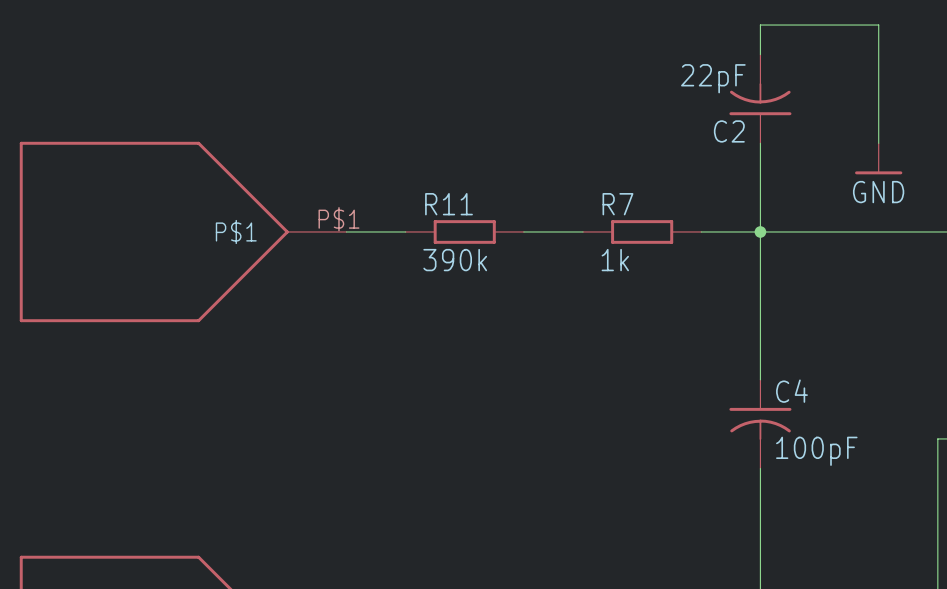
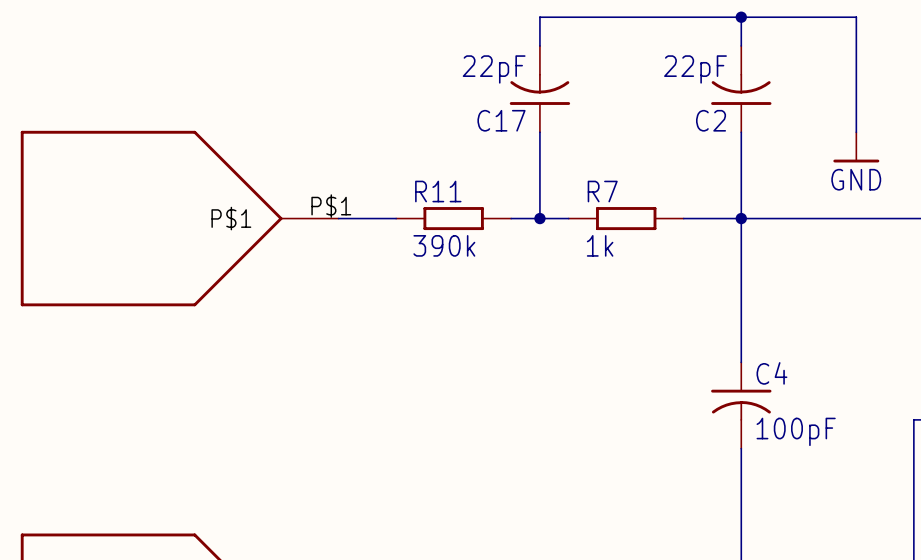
wire: none -> (741, 17) (539, 17) (539, 45)
junction: none -> (741, 17)
C17: none -> 22pF (539, 89)
wire: none -> (539, 132) (539, 218)
junction: none -> (539, 218)

